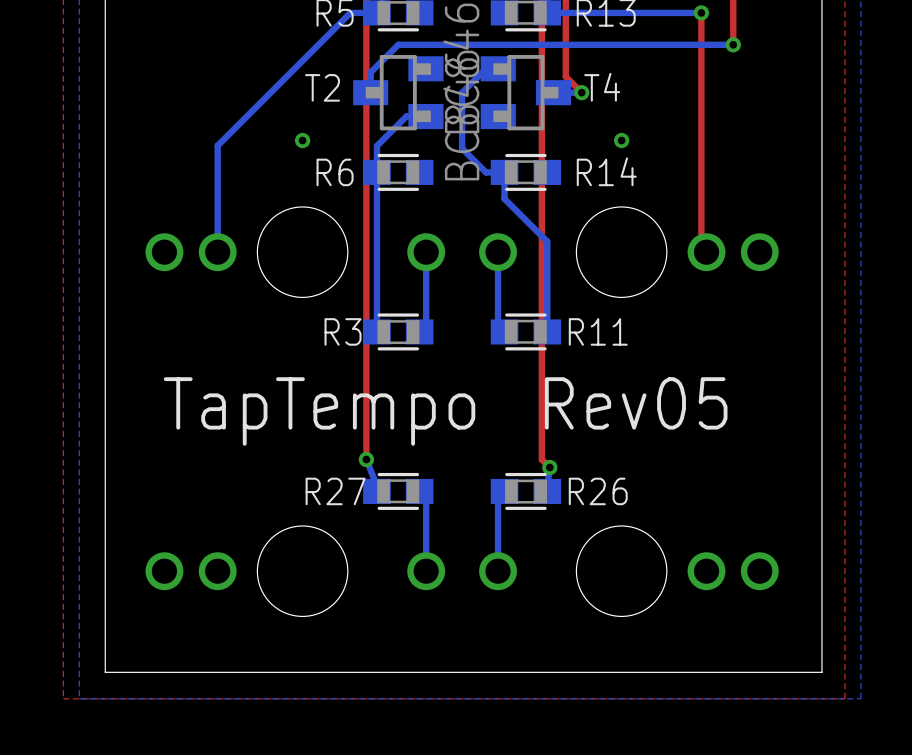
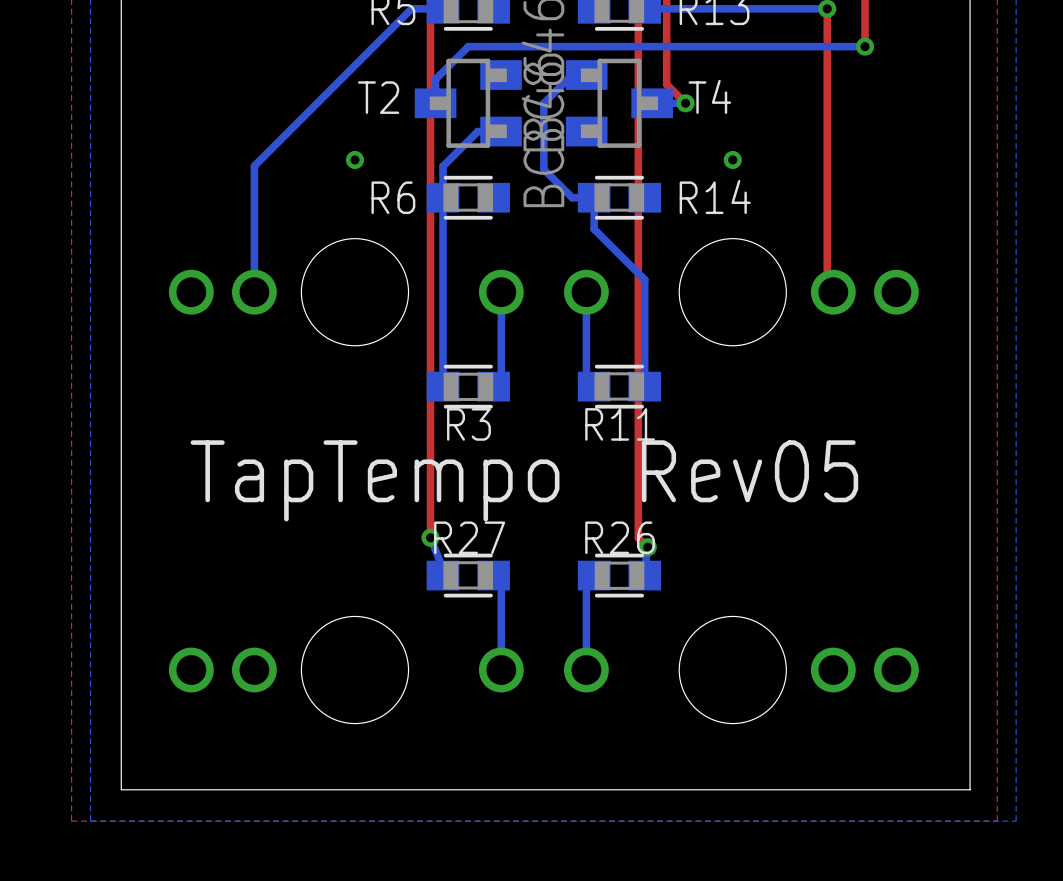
R3 name position: R3 (343, 331) -> R3 (468, 424)
R11 name position: R11 (598, 331) -> R11 (620, 424)
R27 name position: R27 (335, 491) -> R27 (469, 537)
R26 name position: R26 (598, 491) -> R26 (620, 537)

